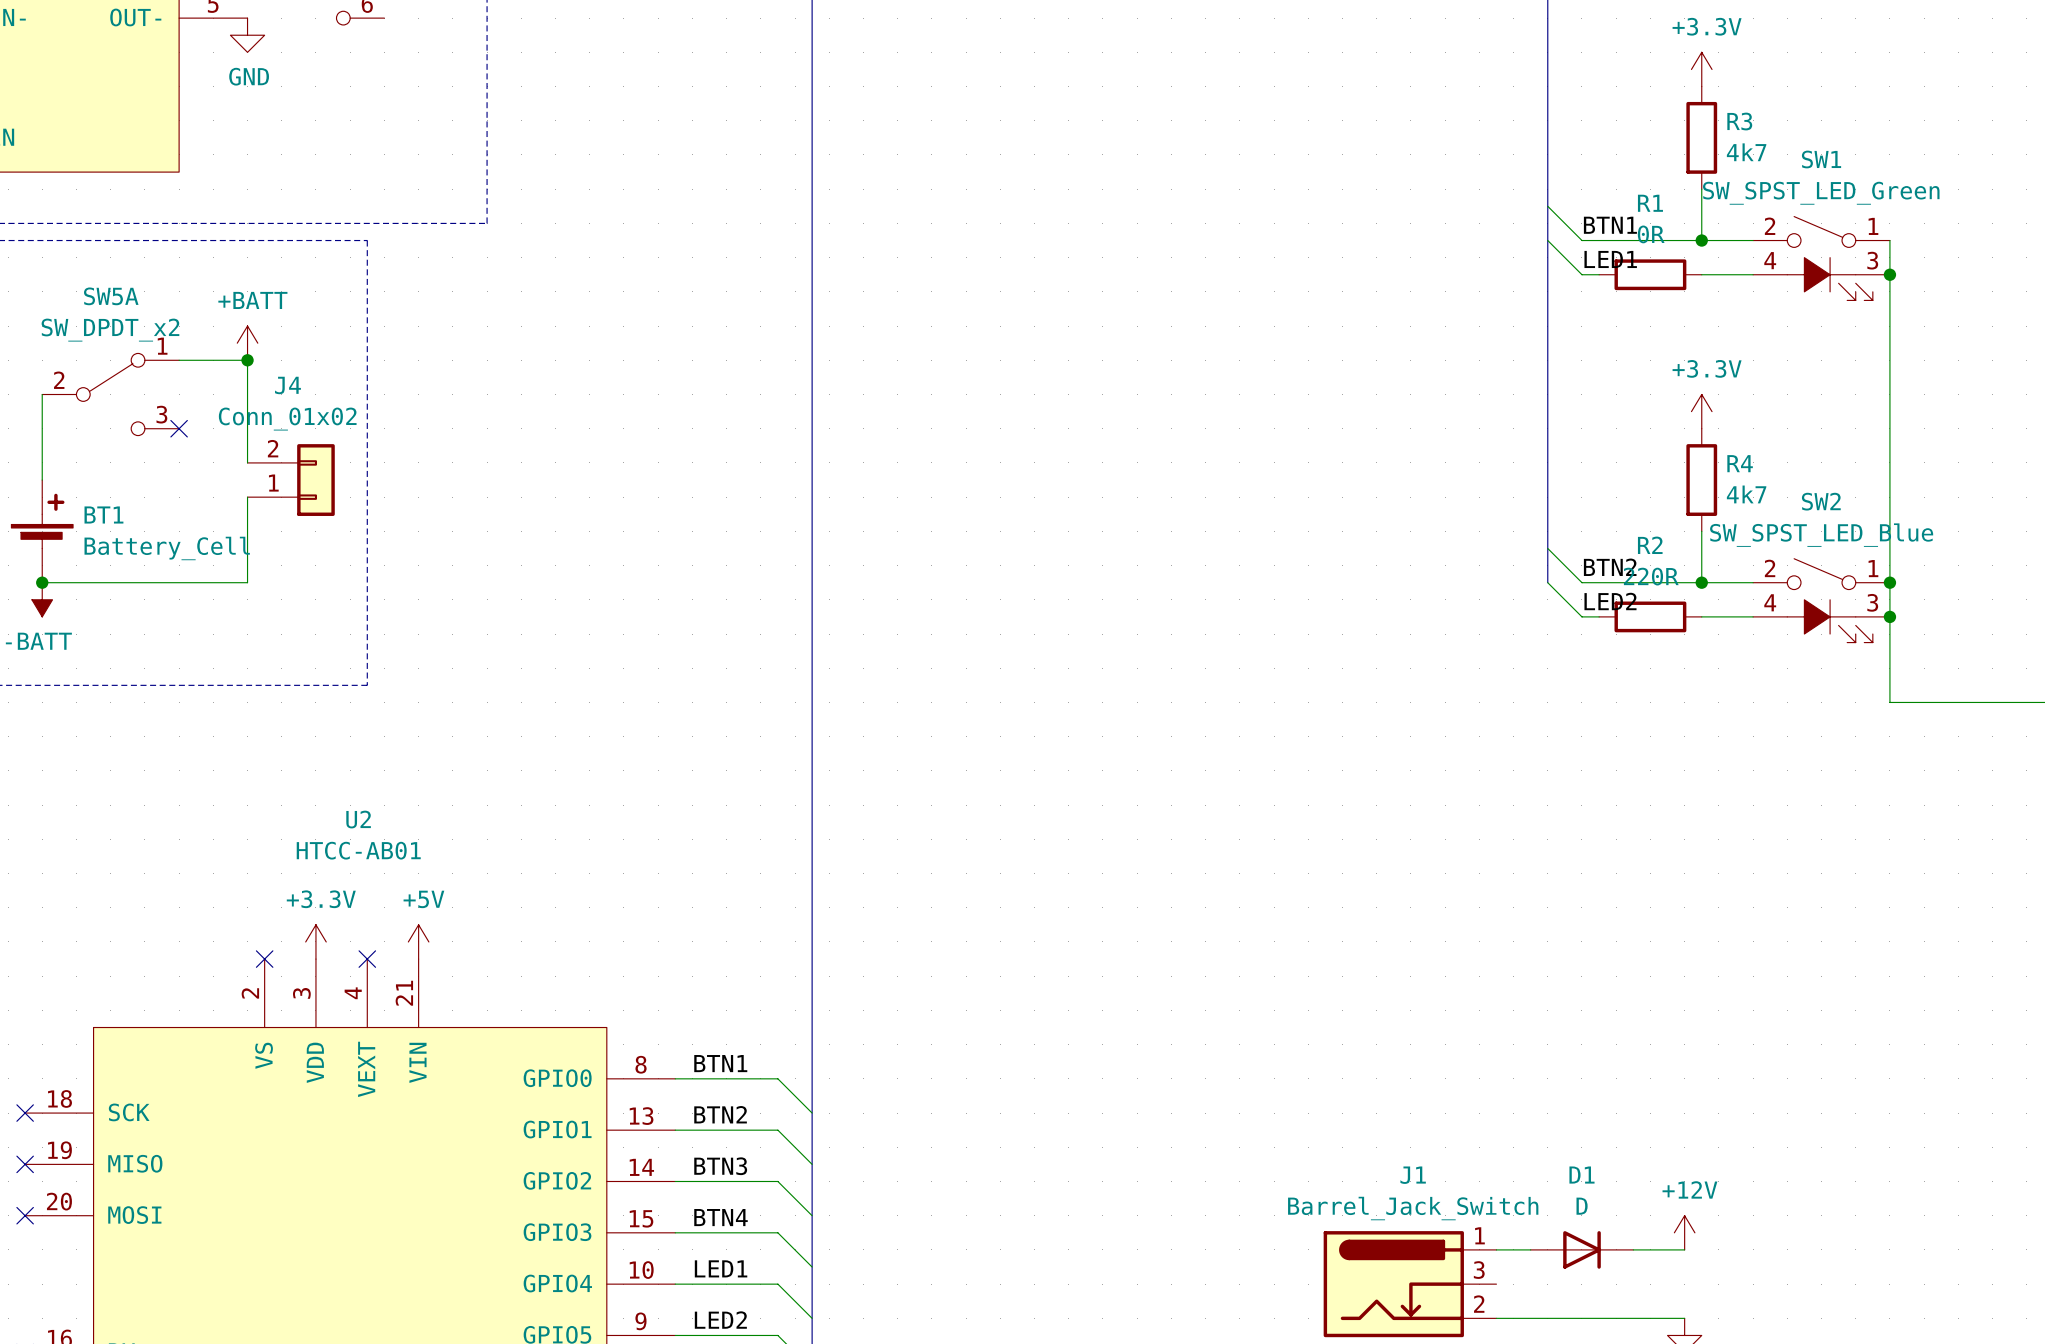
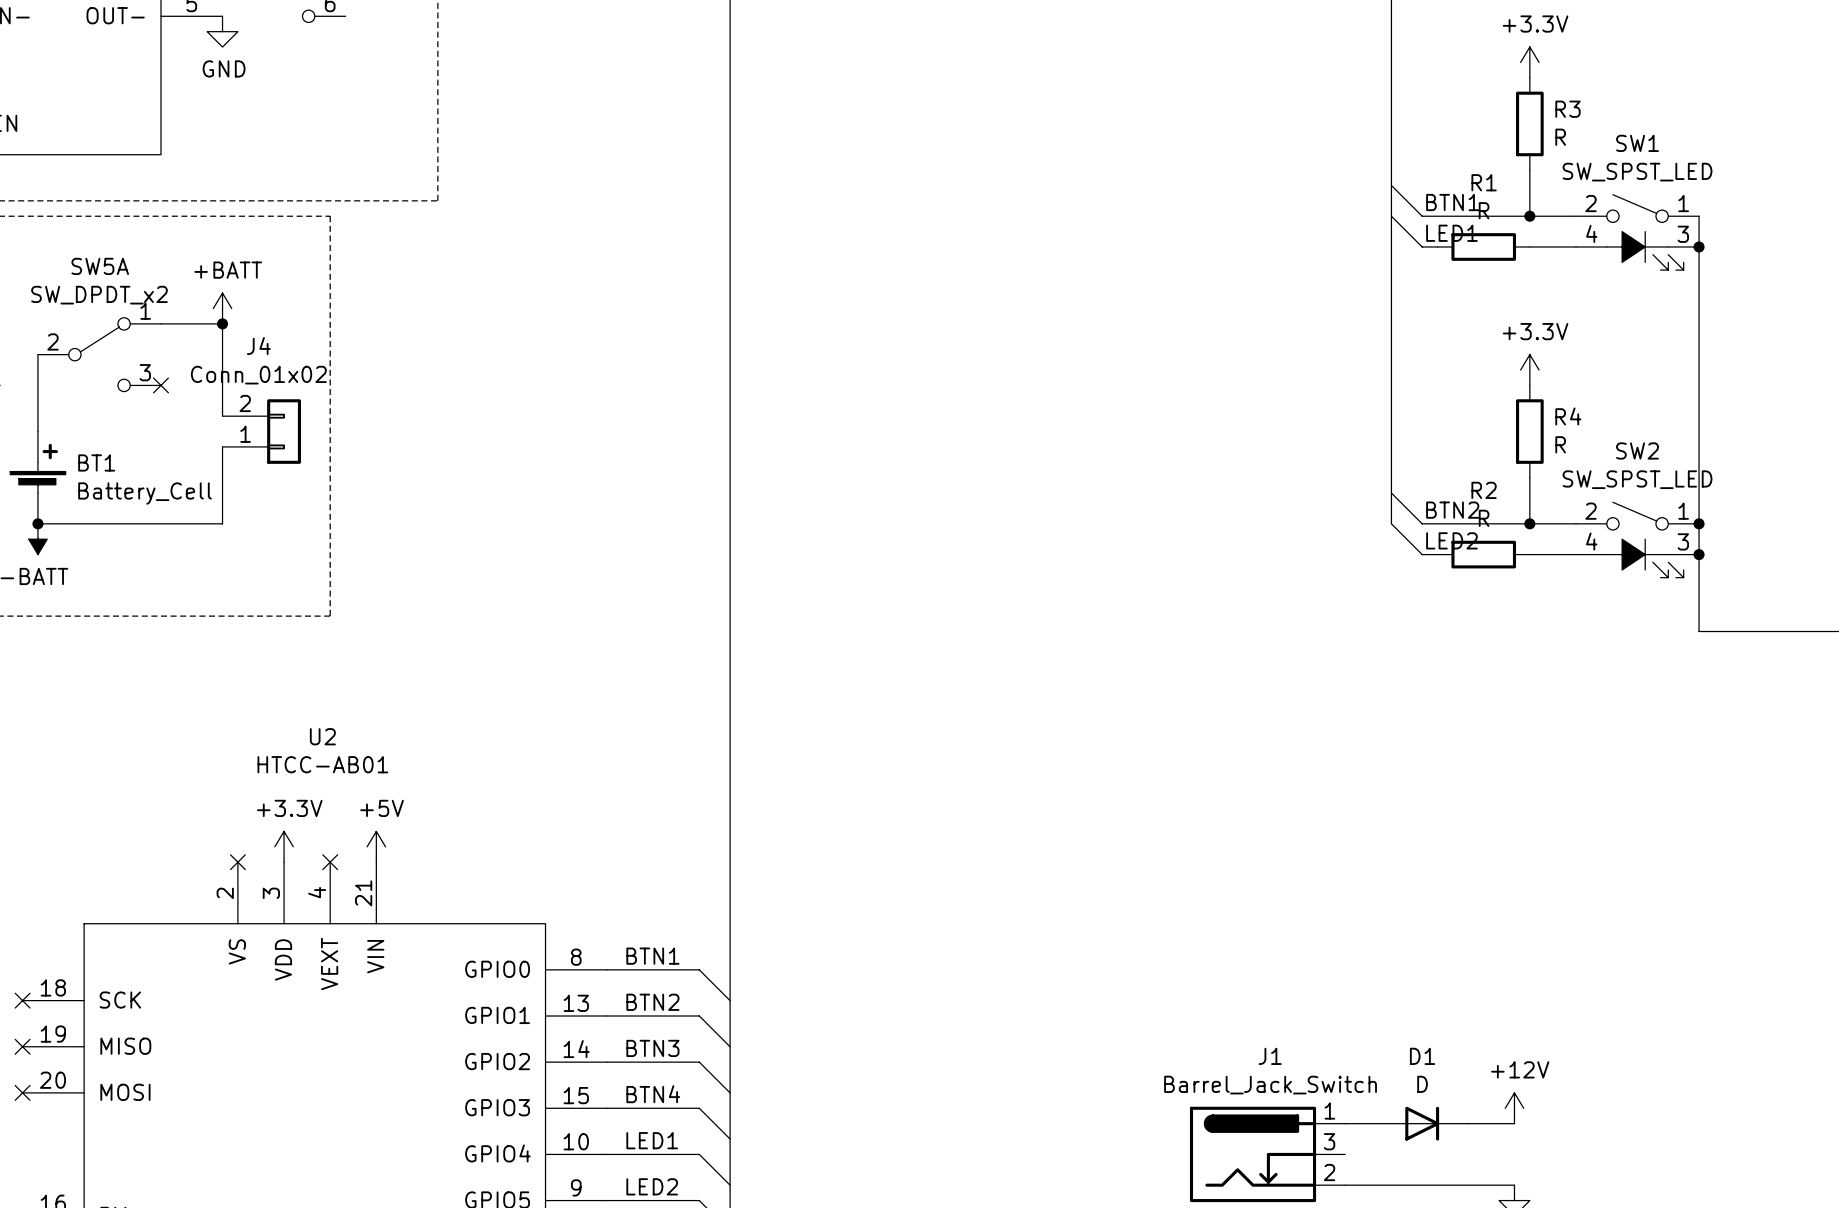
R3 value: 4k7 (1746, 152) -> R (1560, 137)
SW1 value: SW_SPST_LED_Green (1821, 193) -> SW_SPST_LED (1637, 172)
R1 value: 0R (1651, 234) -> R (1484, 210)
R4 value: 4k7 (1746, 494) -> R (1560, 444)
SW2 value: SW_SPST_LED_Blue (1821, 535) -> SW_SPST_LED (1637, 479)
R2 value: 220R (1651, 576) -> R (1484, 518)

